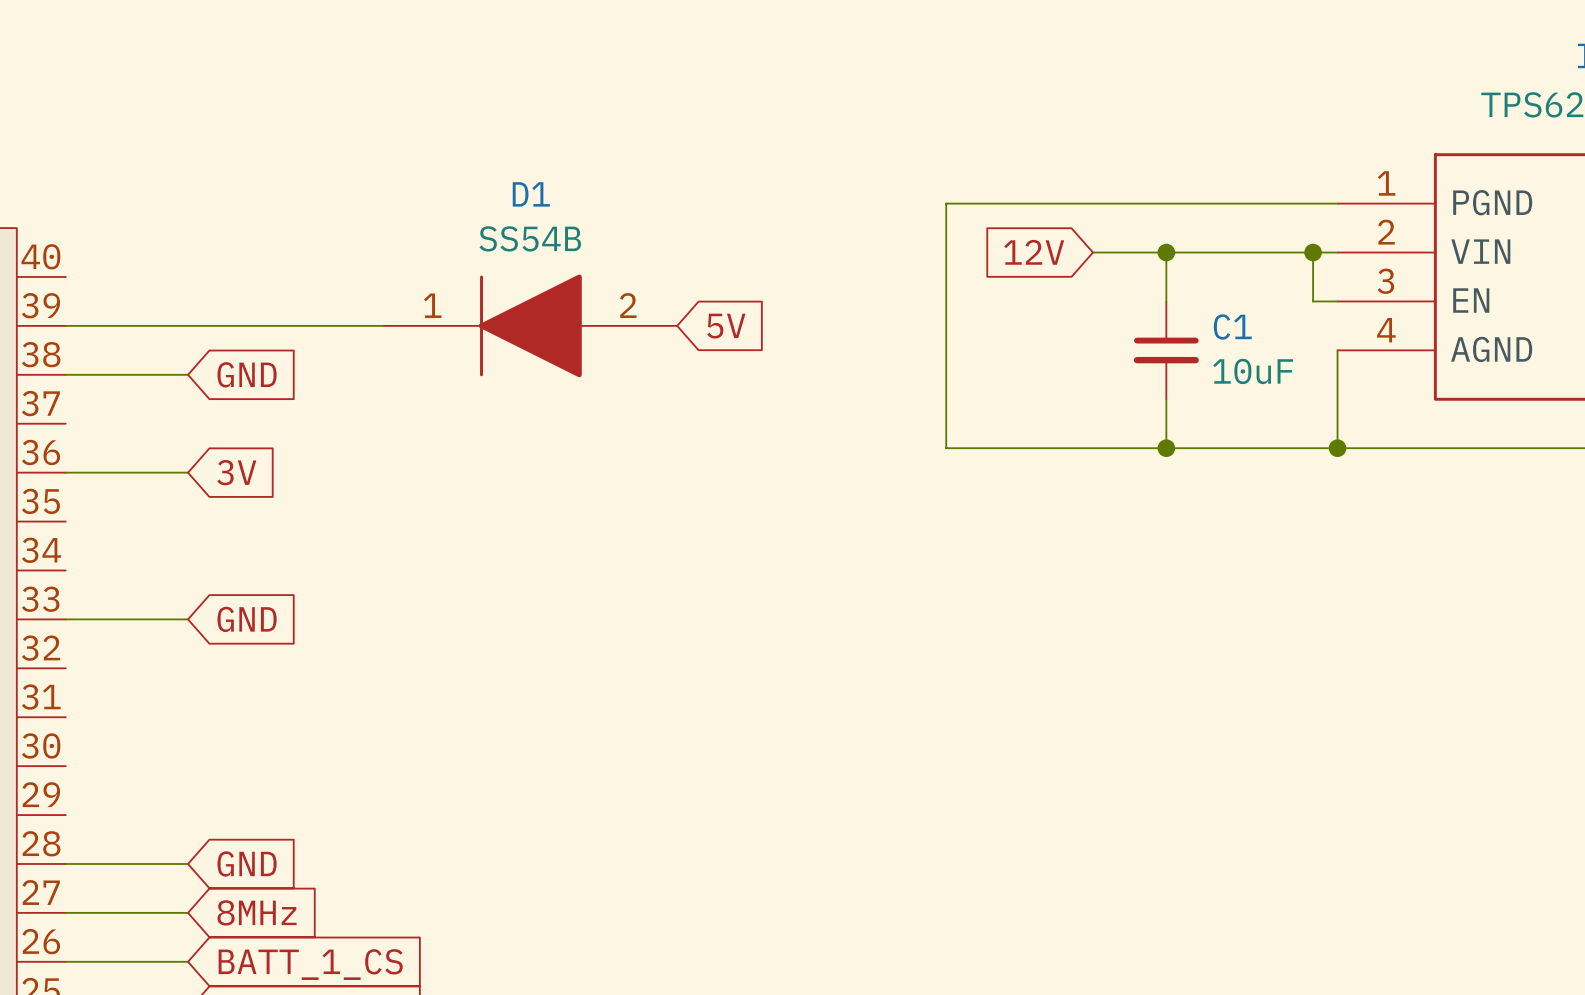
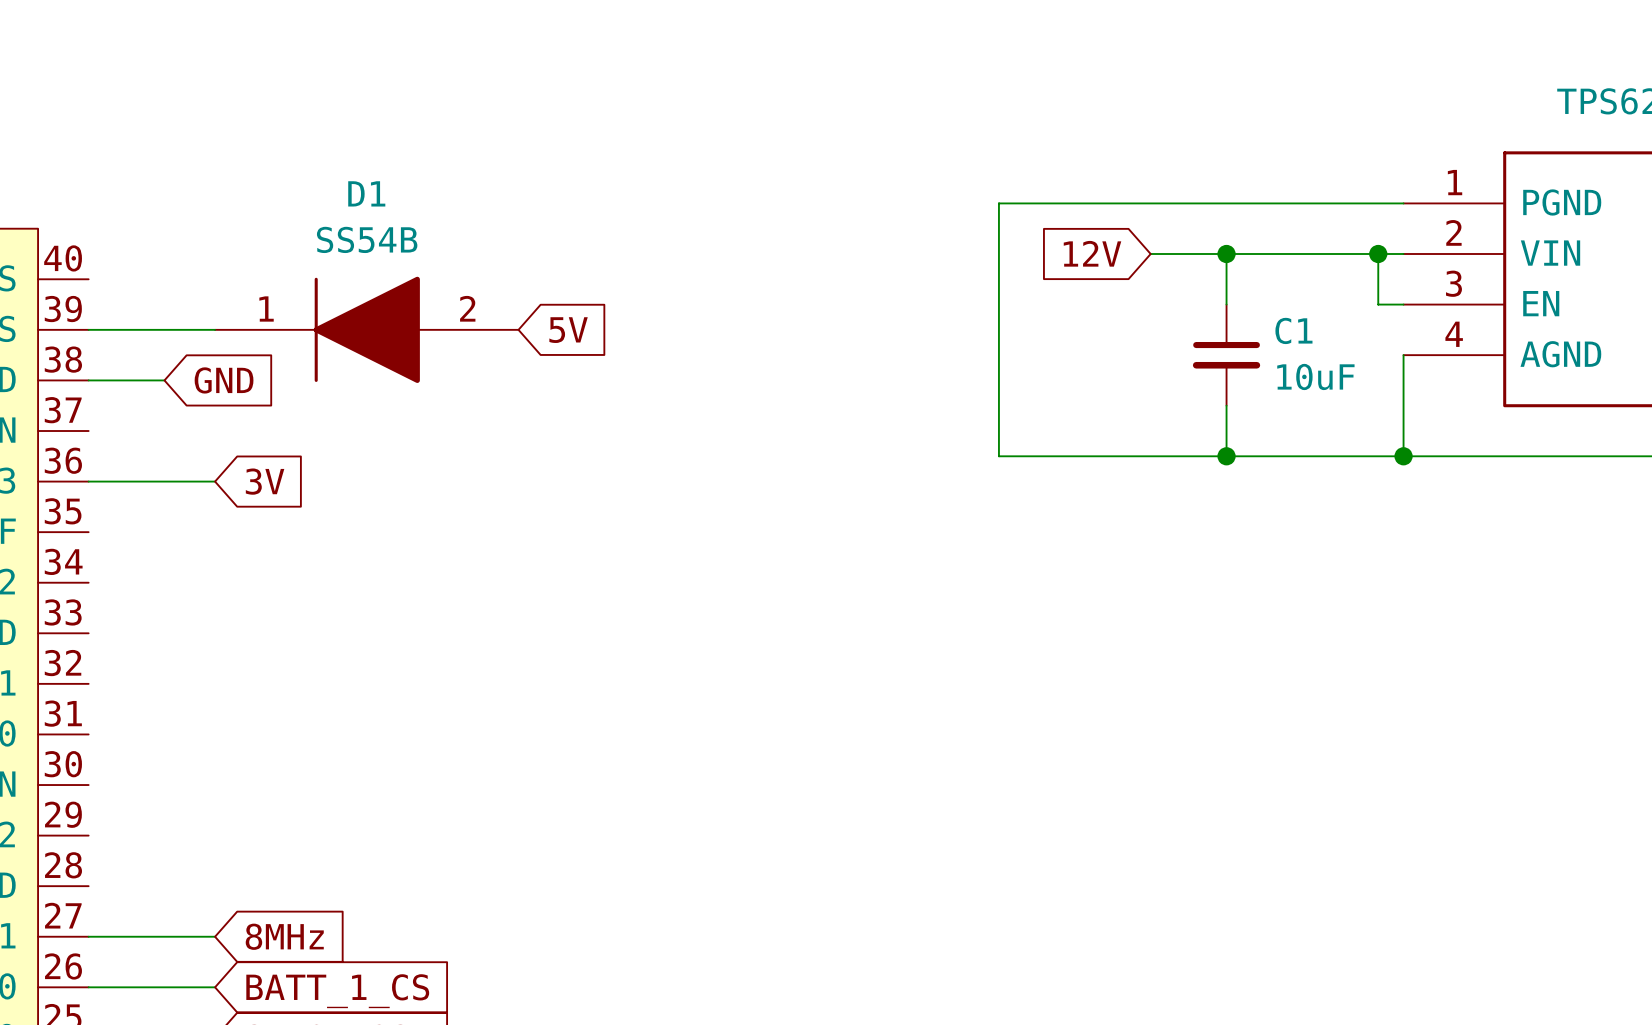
D1 position: (530, 325) -> (366, 329)
global label position: 5V (726, 326) -> 5V (568, 330)
wire: (139, 374) (188, 374) -> none
global label position: GND (247, 374) -> GND (224, 380)
wire: (65, 619) (188, 619) -> none
global label: GND (247, 619) -> none
wire: (65, 863) (188, 863) -> none
global label: GND (247, 863) -> none

